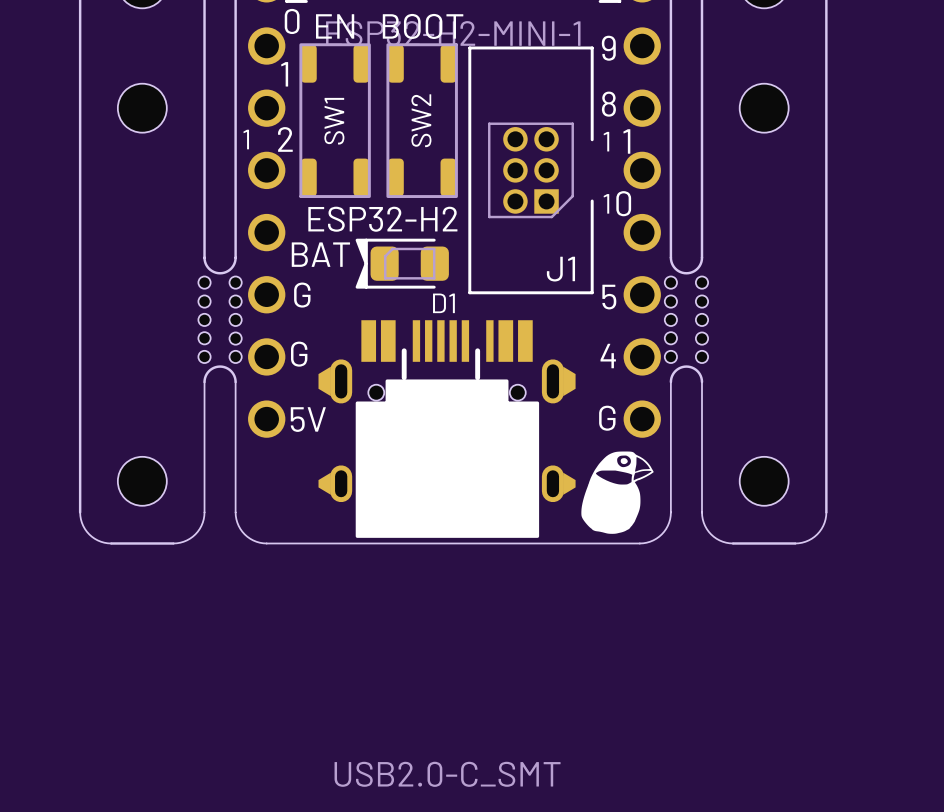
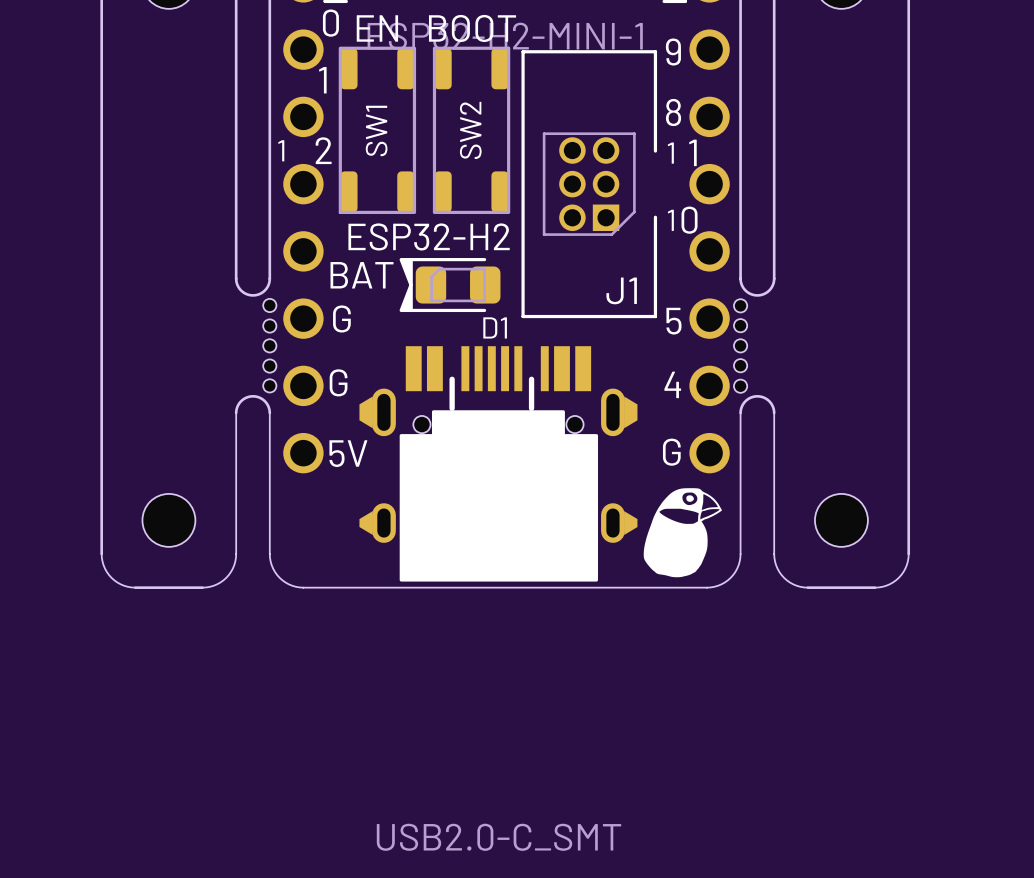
part: (142, 108) -> none
part: (764, 108) -> none
part footprint: [198, 256, 242, 384] -> [234, 277, 277, 415]
part footprint: [664, 256, 709, 384] -> [733, 277, 776, 415]

